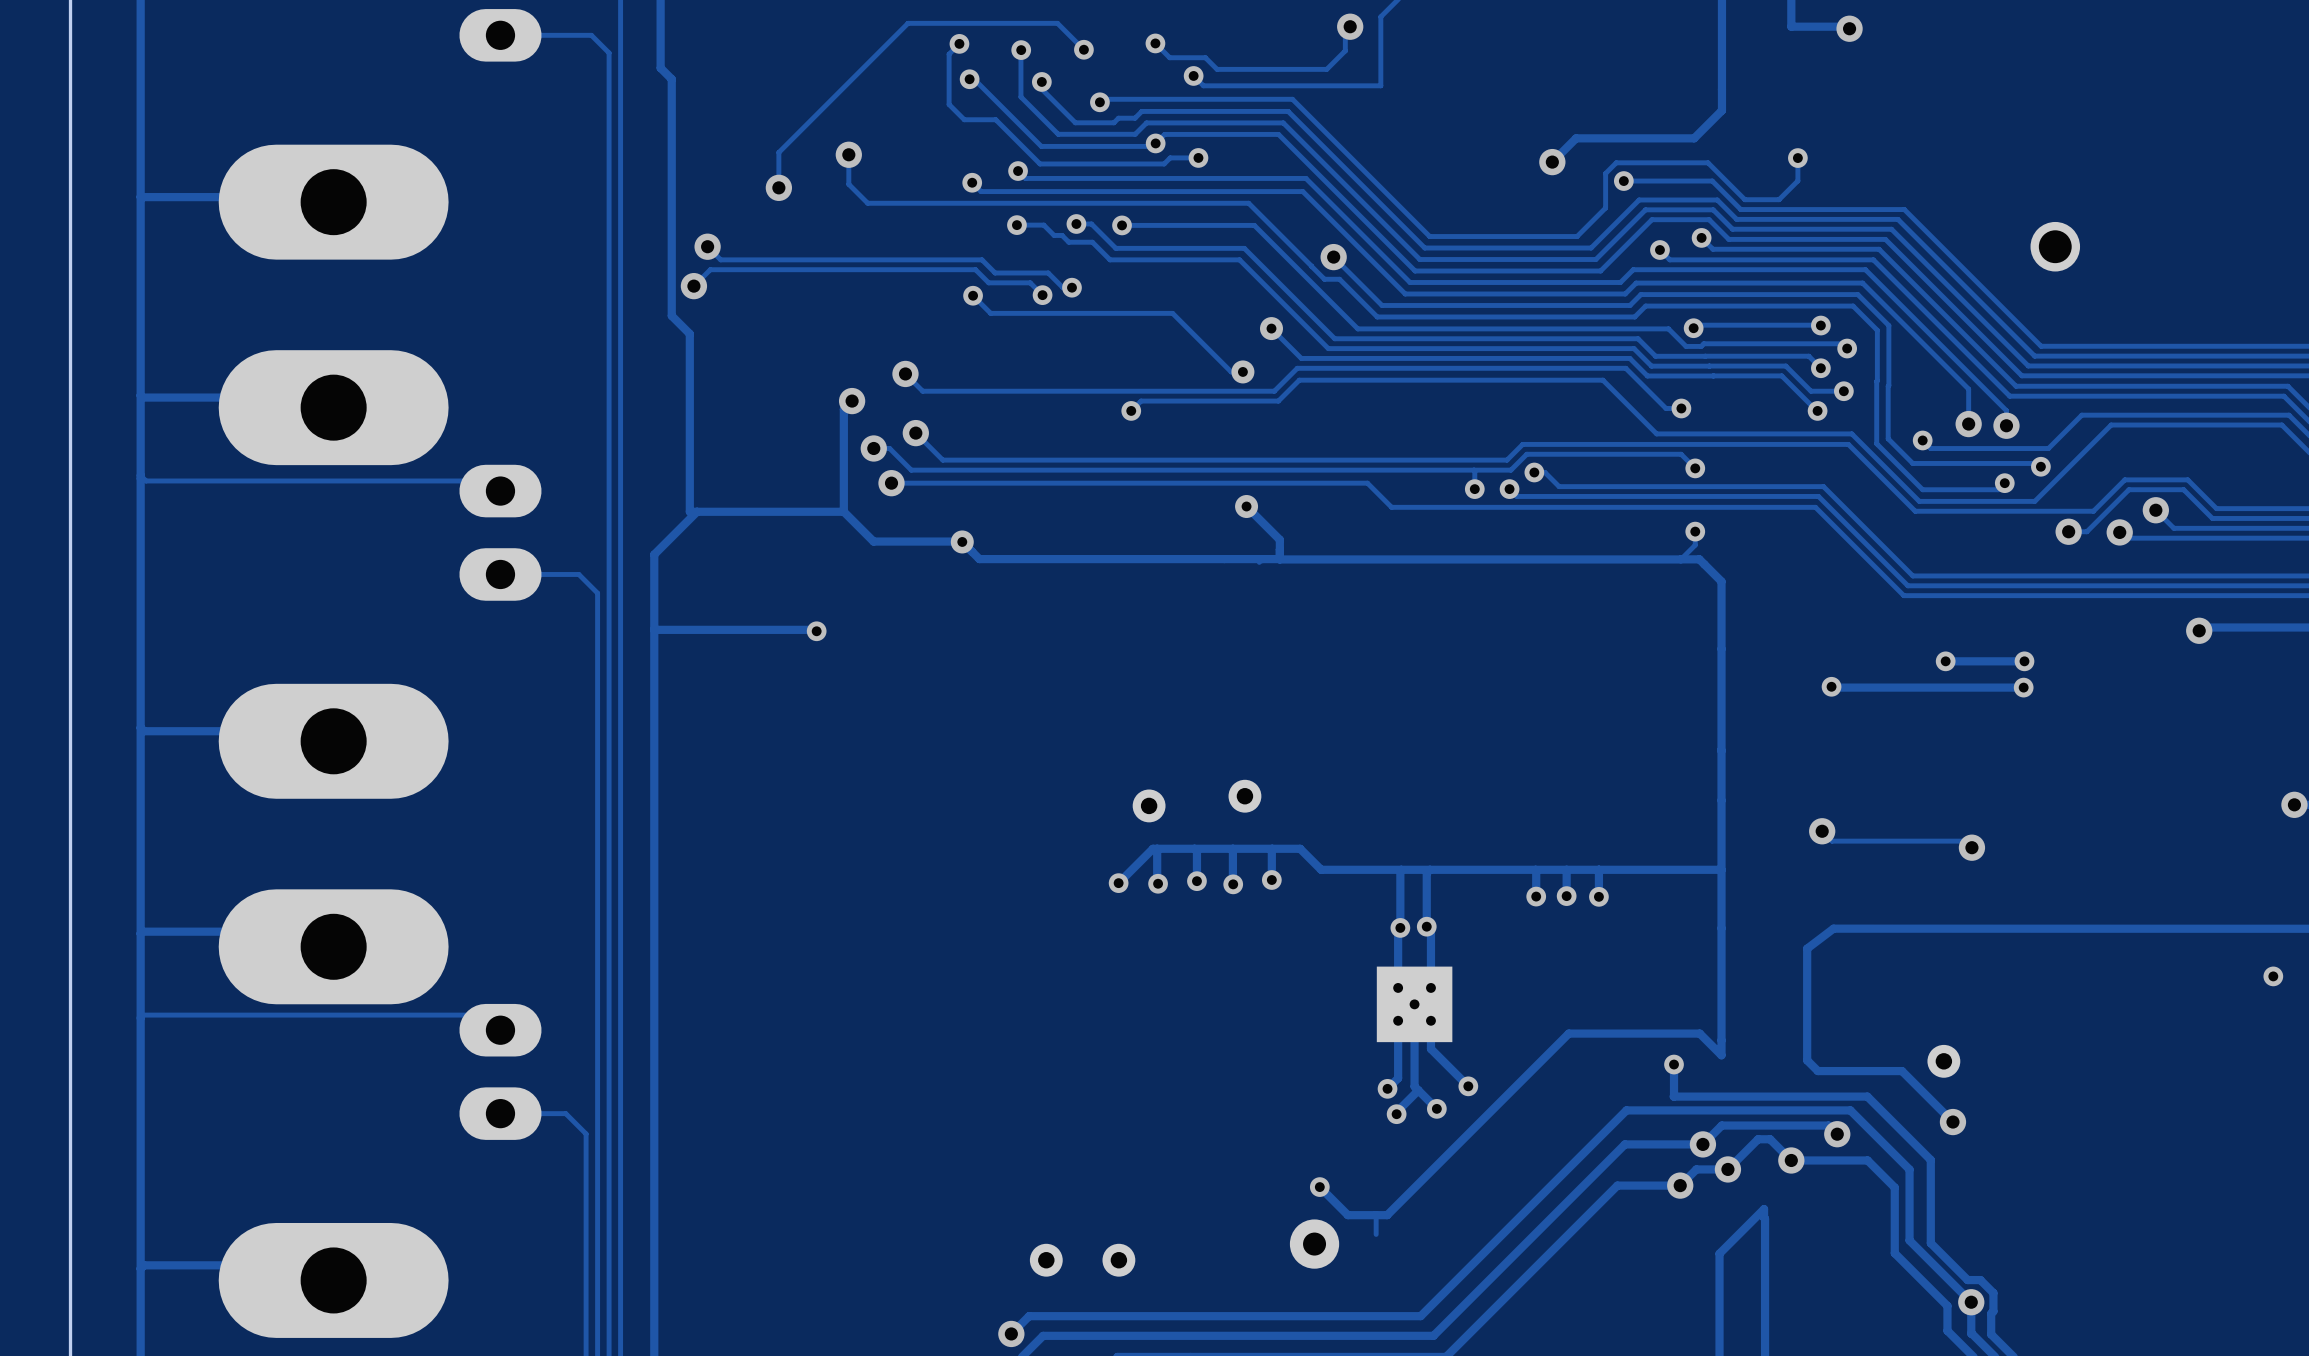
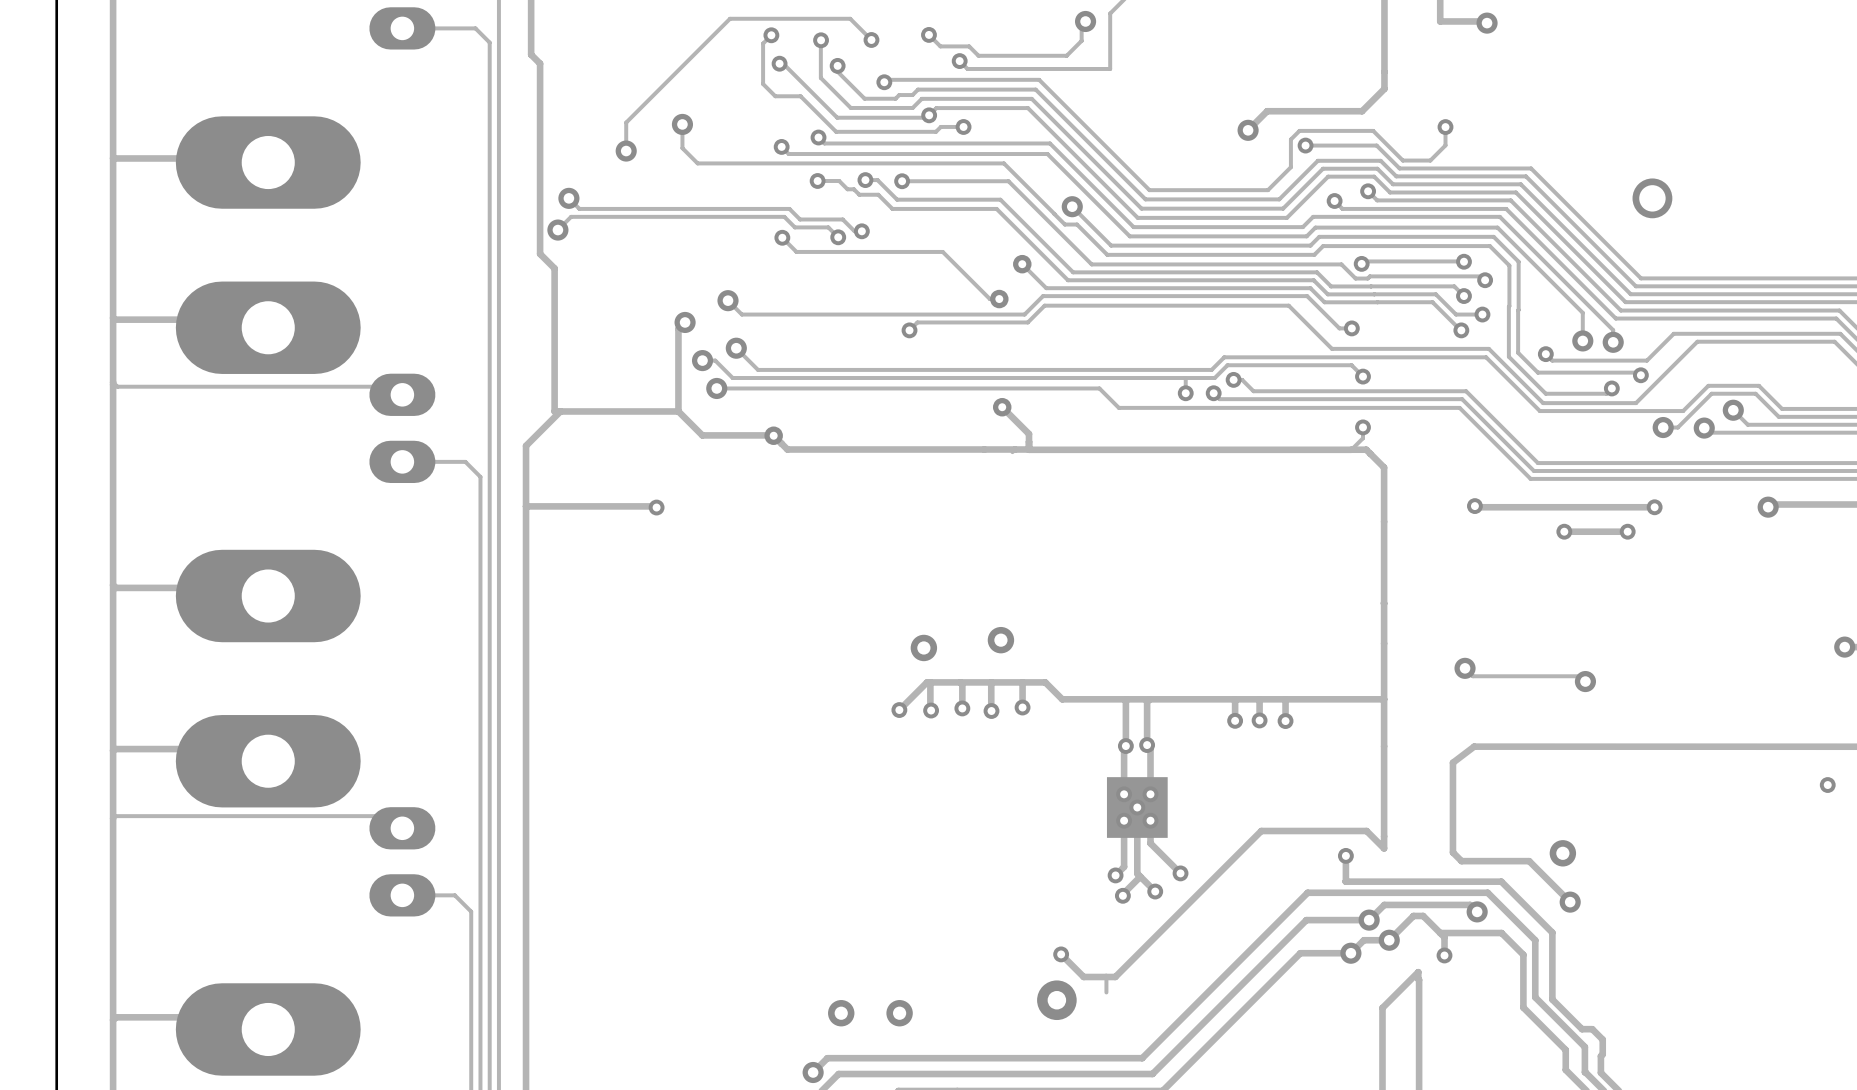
track: none -> (1474, 506) (1654, 507)
track: (1831, 686) (2023, 687) -> none
via position: (1831, 686) -> (1474, 506)
via position: (2023, 687) -> (1654, 507)
track: none -> (1440, 933) (1444, 937) (1444, 955)
via: (1791, 1160) -> none
via: none -> (1444, 955)
via: (1971, 1302) -> none

